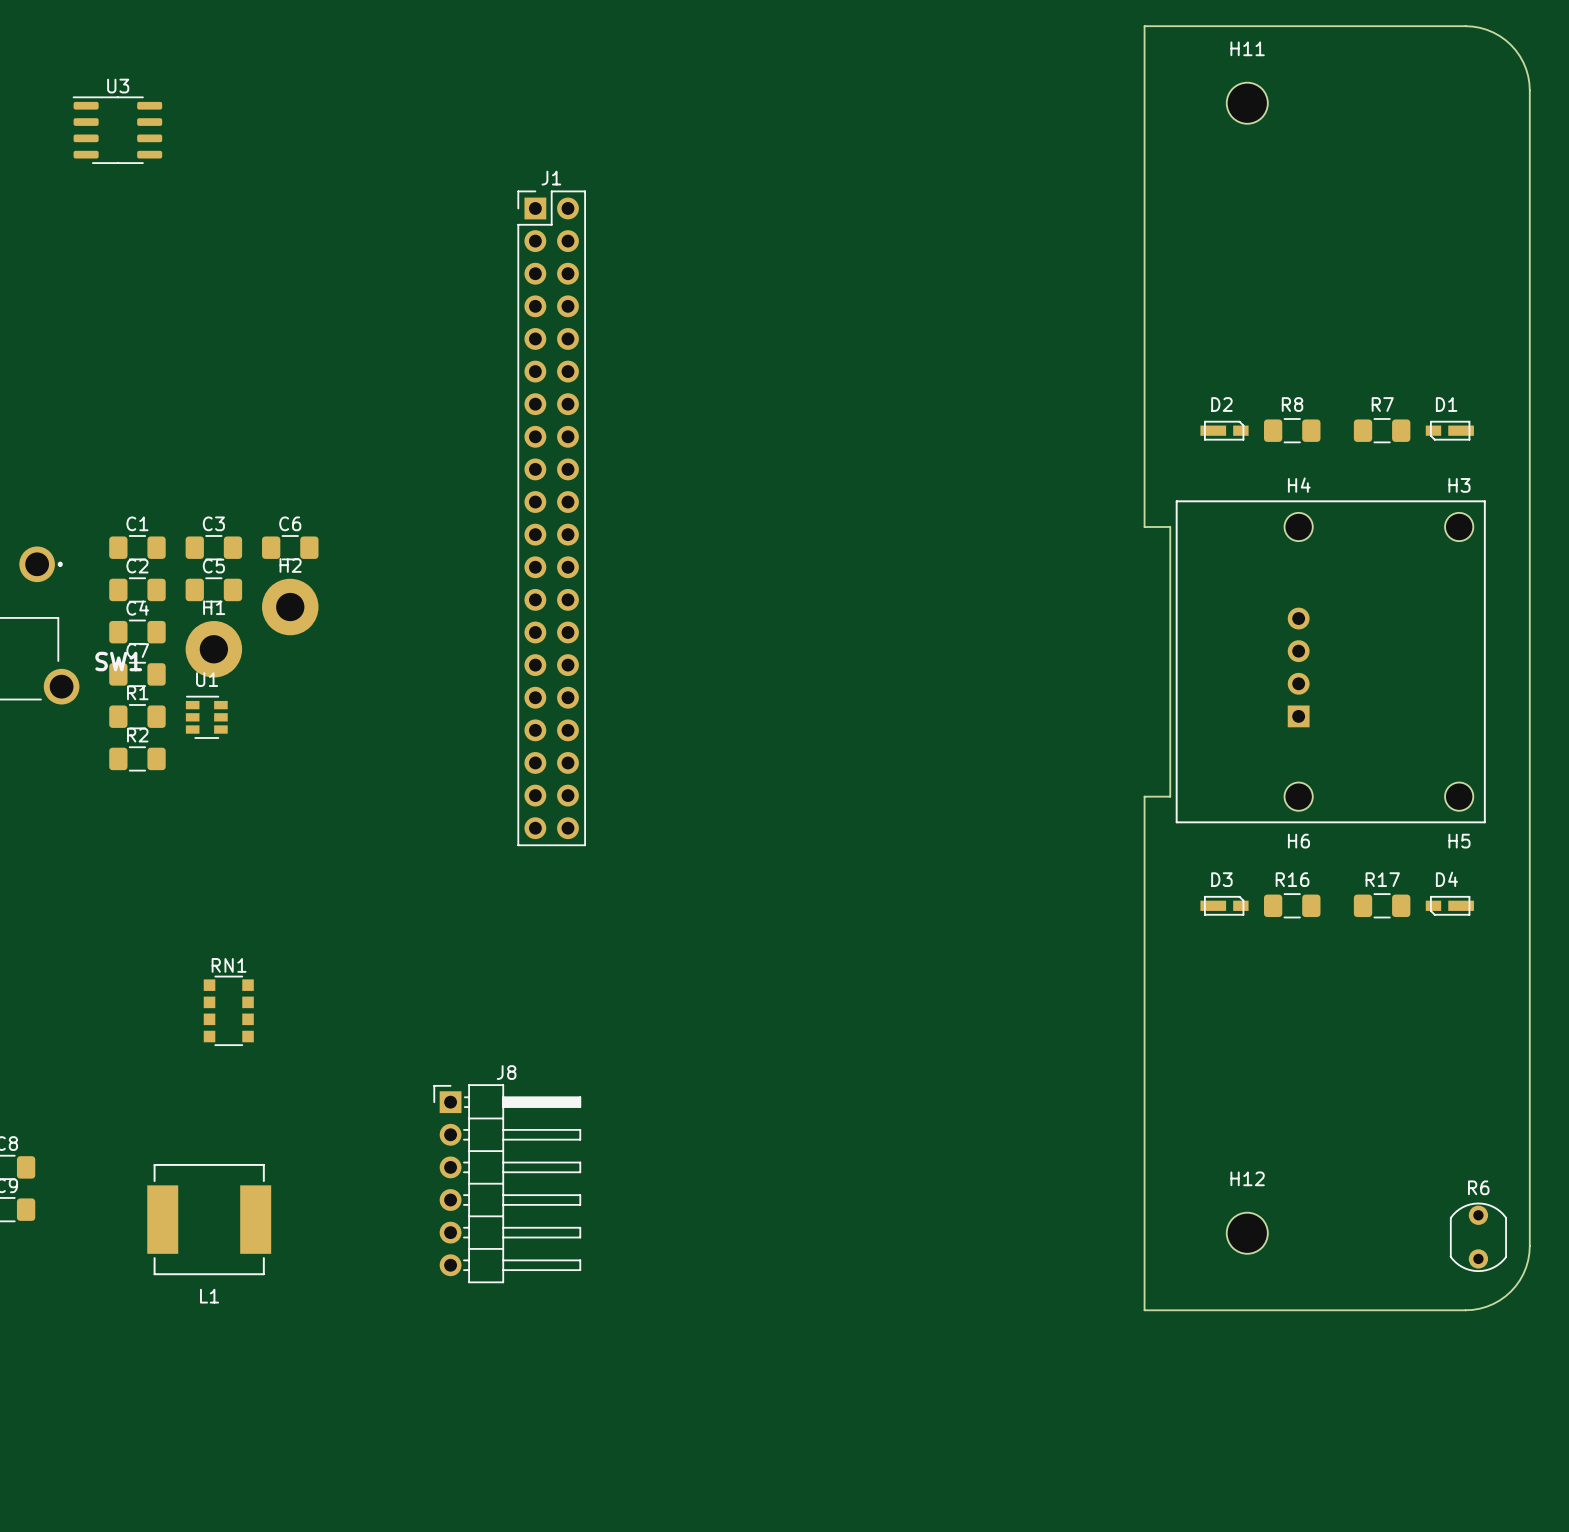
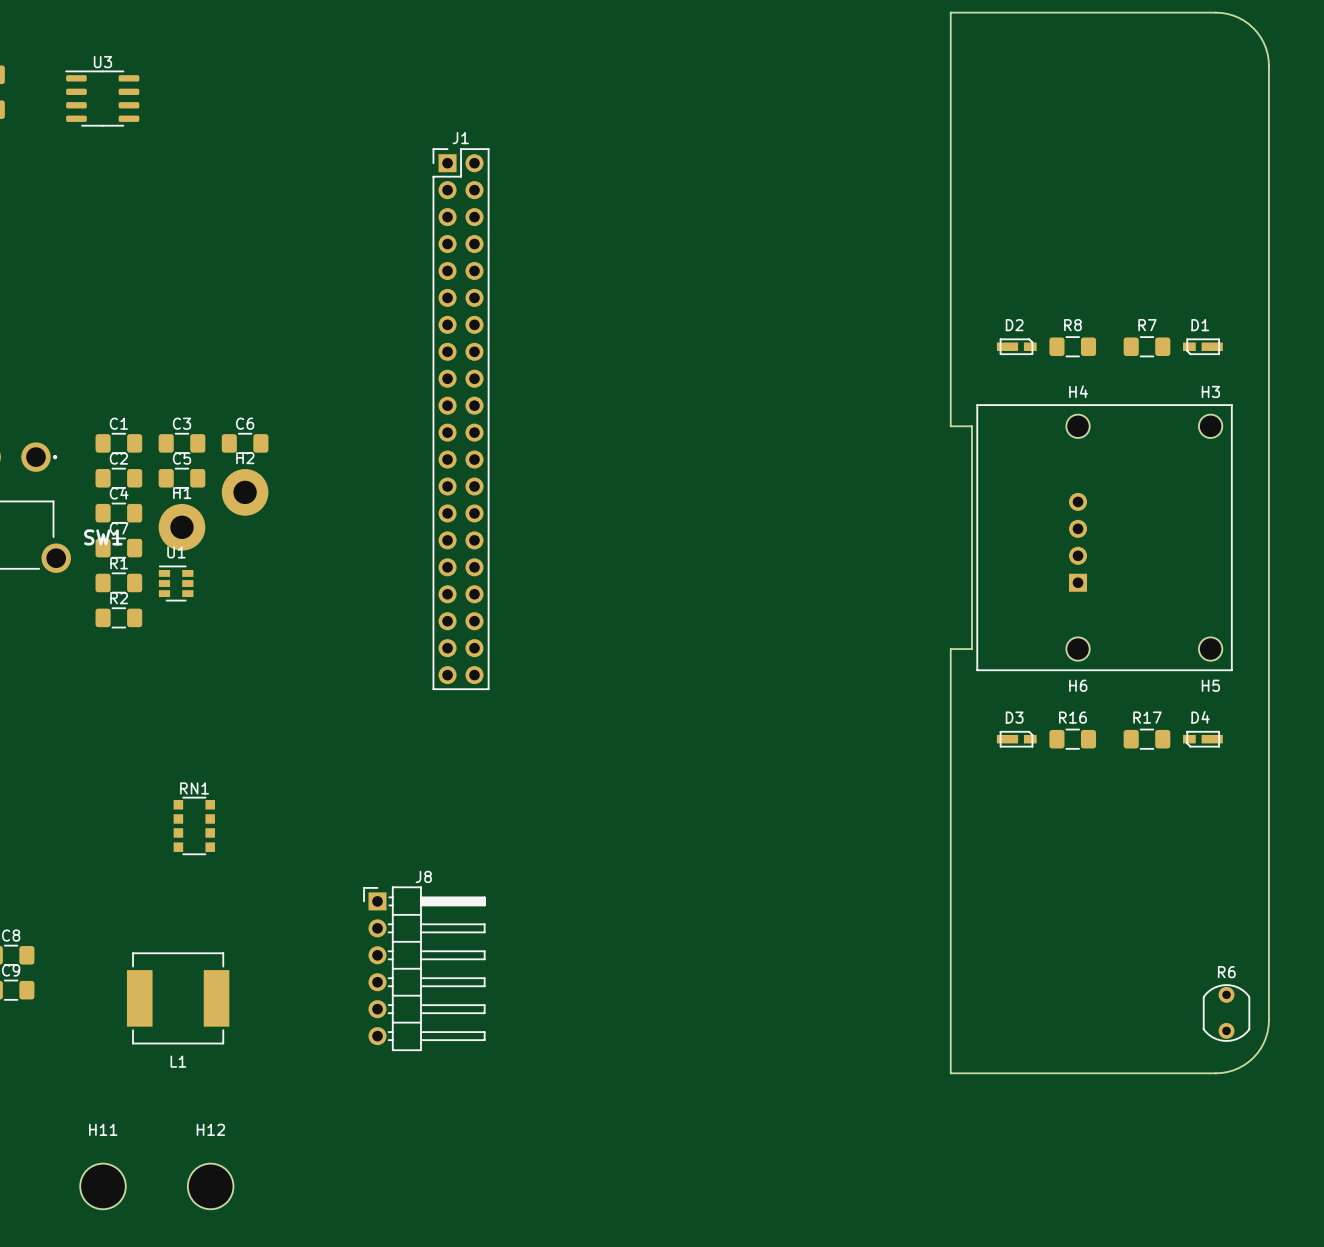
H11 footprint: [1226, 82, 1268, 124] -> [80, 1163, 126, 1210]
H12 footprint: [1226, 1212, 1268, 1254] -> [187, 1163, 234, 1210]

